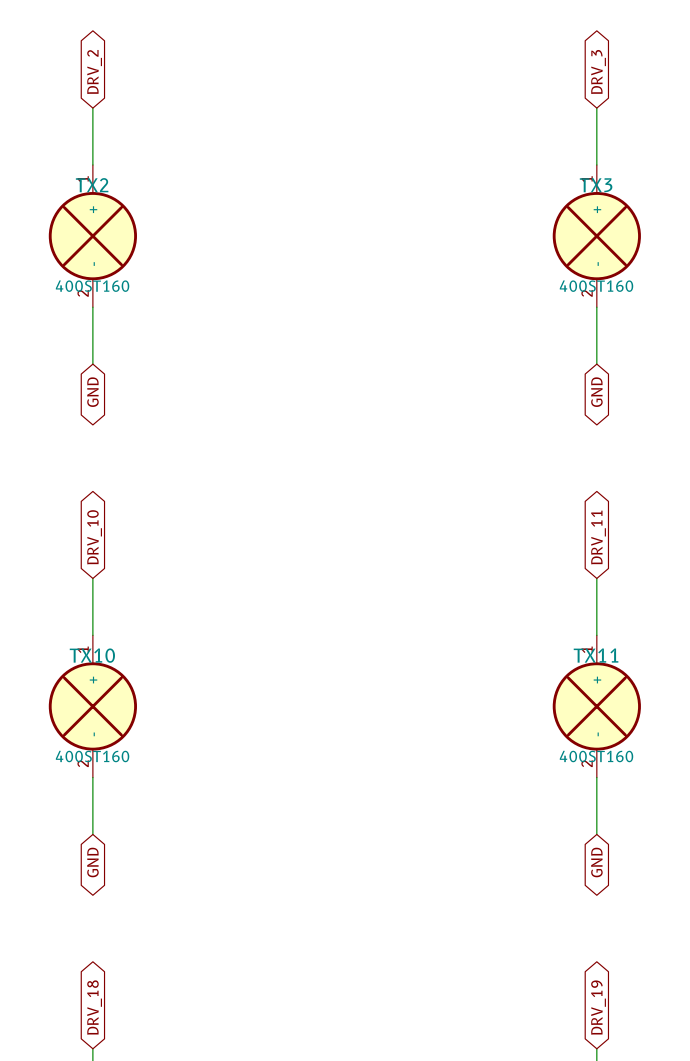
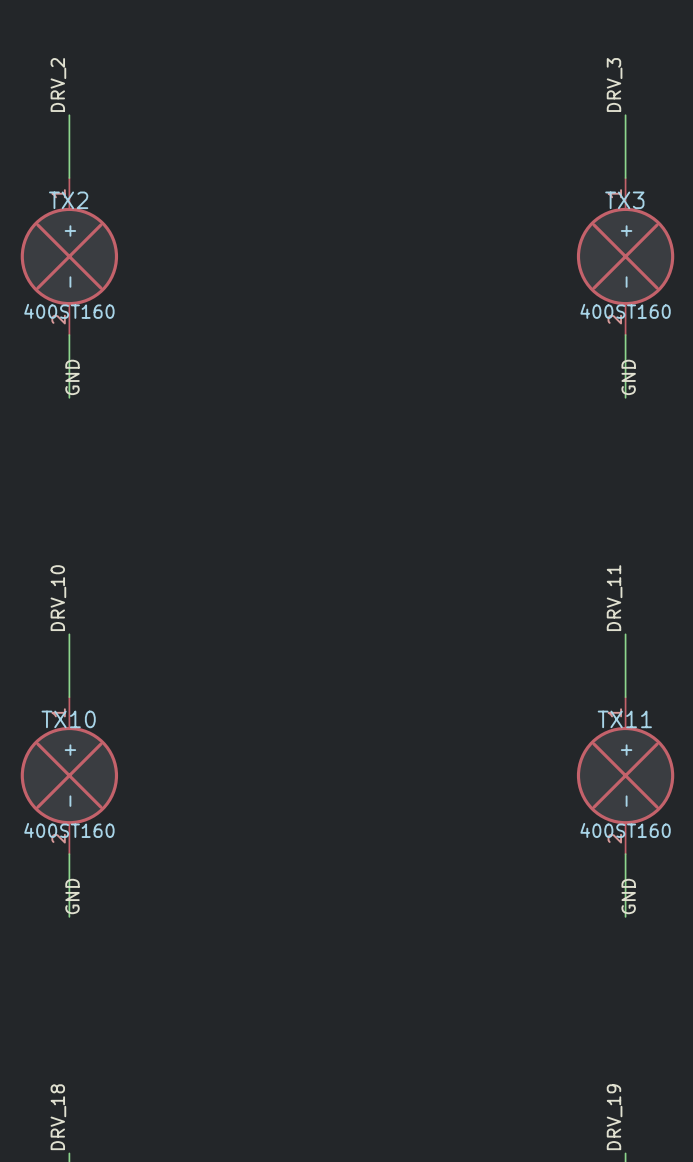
global label: DRV_2 (94, 72) -> none
global label: DRV_3 (598, 72) -> none
label: none -> DRV_2 (58, 85)
label: none -> DRV_3 (614, 85)
label: none -> GND (72, 377)
label: none -> GND (628, 377)
global label: GND (92, 392) -> none
global label: GND (596, 392) -> none
global label: DRV_10 (94, 537) -> none
global label: DRV_11 (598, 537) -> none
label: none -> DRV_10 (58, 598)
label: none -> DRV_11 (614, 598)
label: none -> GND (72, 896)
label: none -> GND (628, 896)
global label: GND (92, 862) -> none
global label: GND (596, 862) -> none
global label: DRV_18 (94, 1007) -> none
global label: DRV_19 (598, 1007) -> none
label: none -> DRV_18 (58, 1117)
label: none -> DRV_19 (614, 1117)

